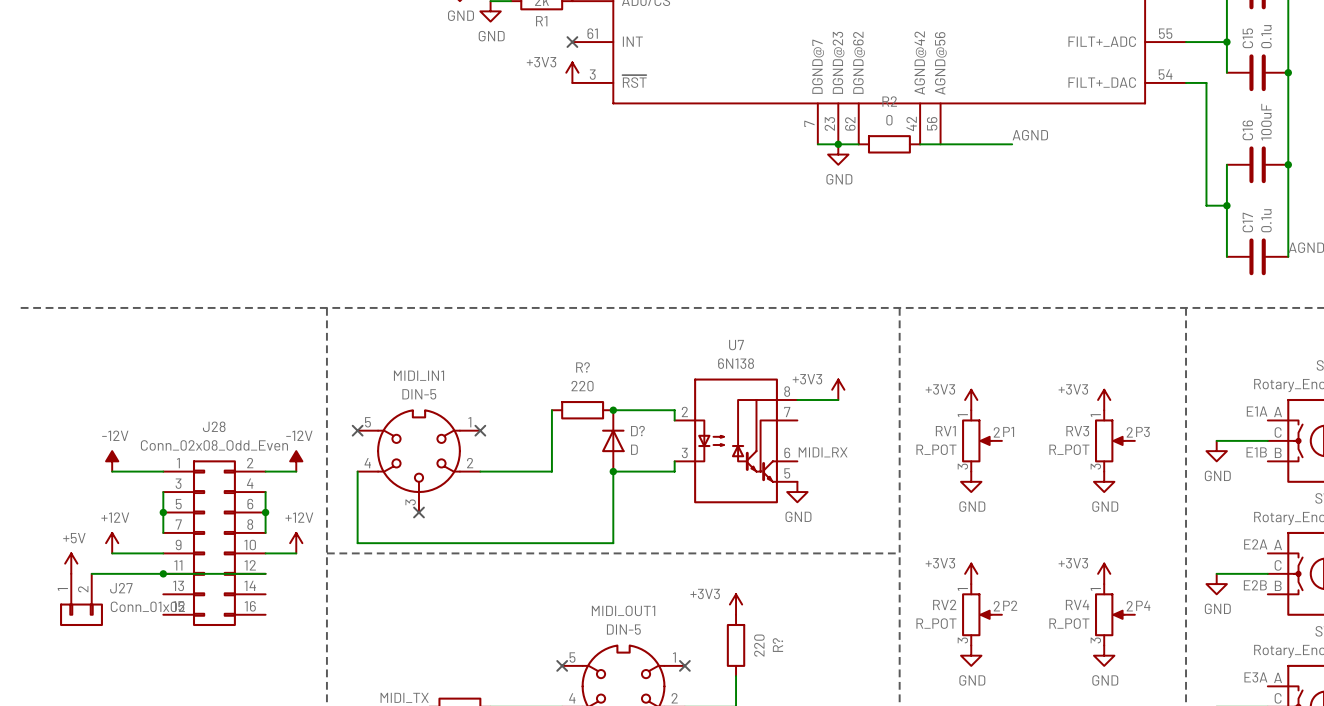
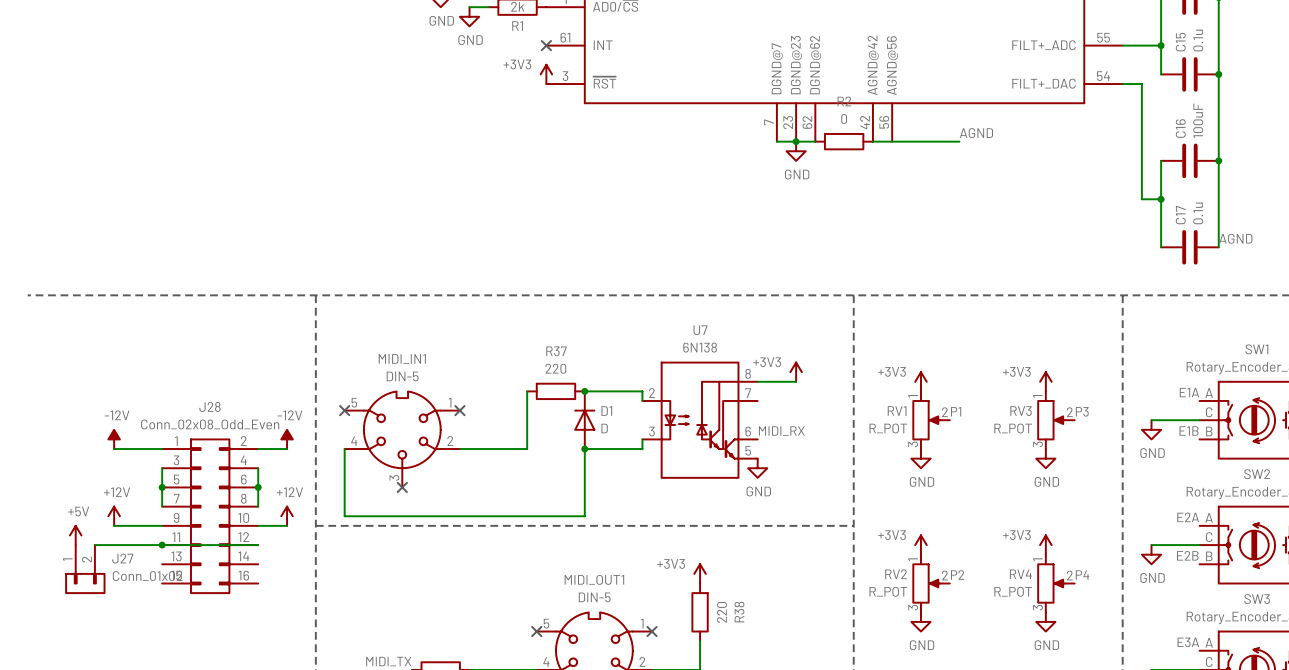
R? name: R? (582, 367) -> R37 (556, 351)
D? name: D? (637, 431) -> D1 (606, 411)
R? name: R? (777, 645) -> R38 (739, 612)

